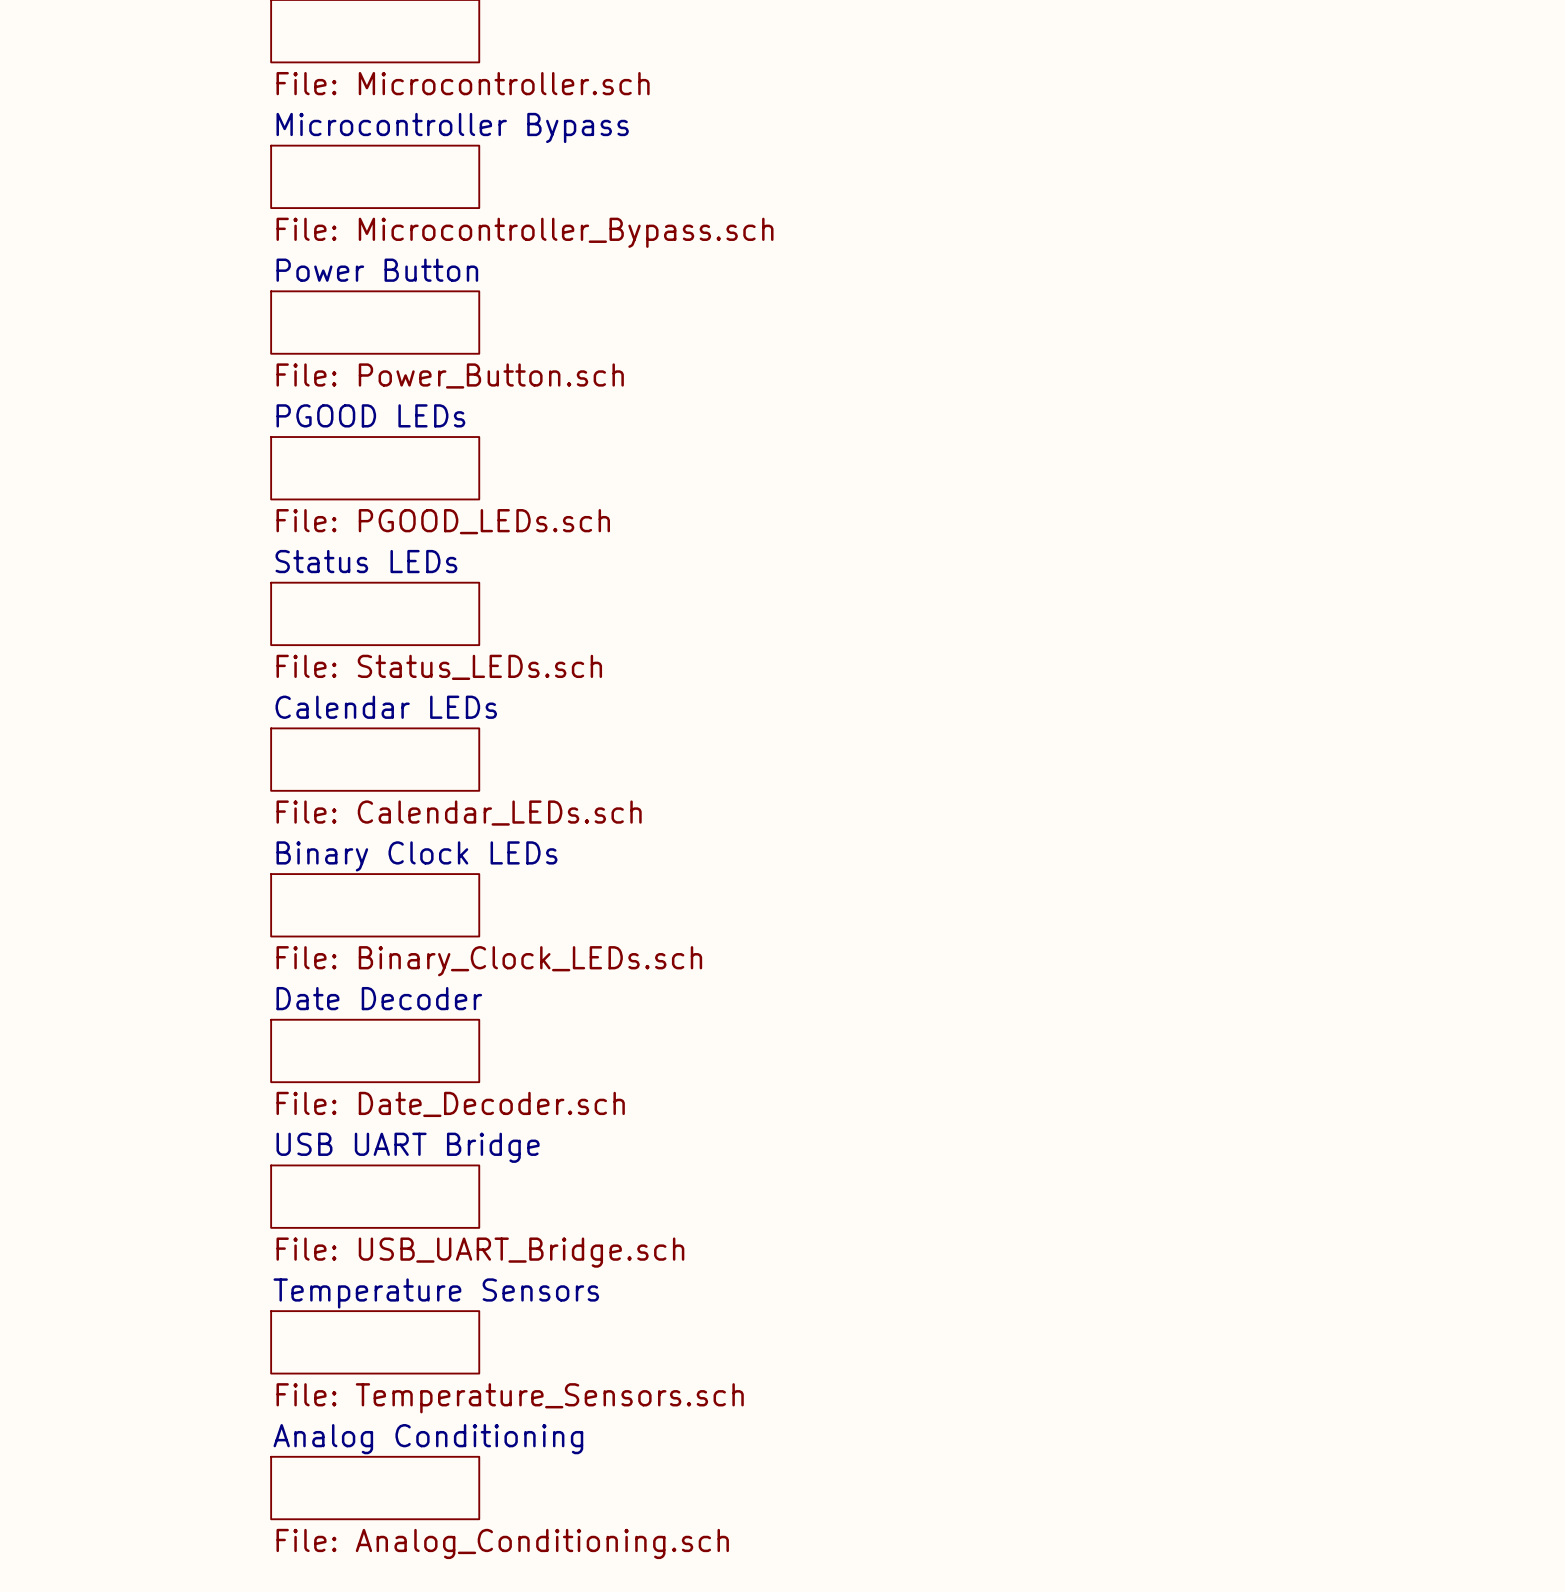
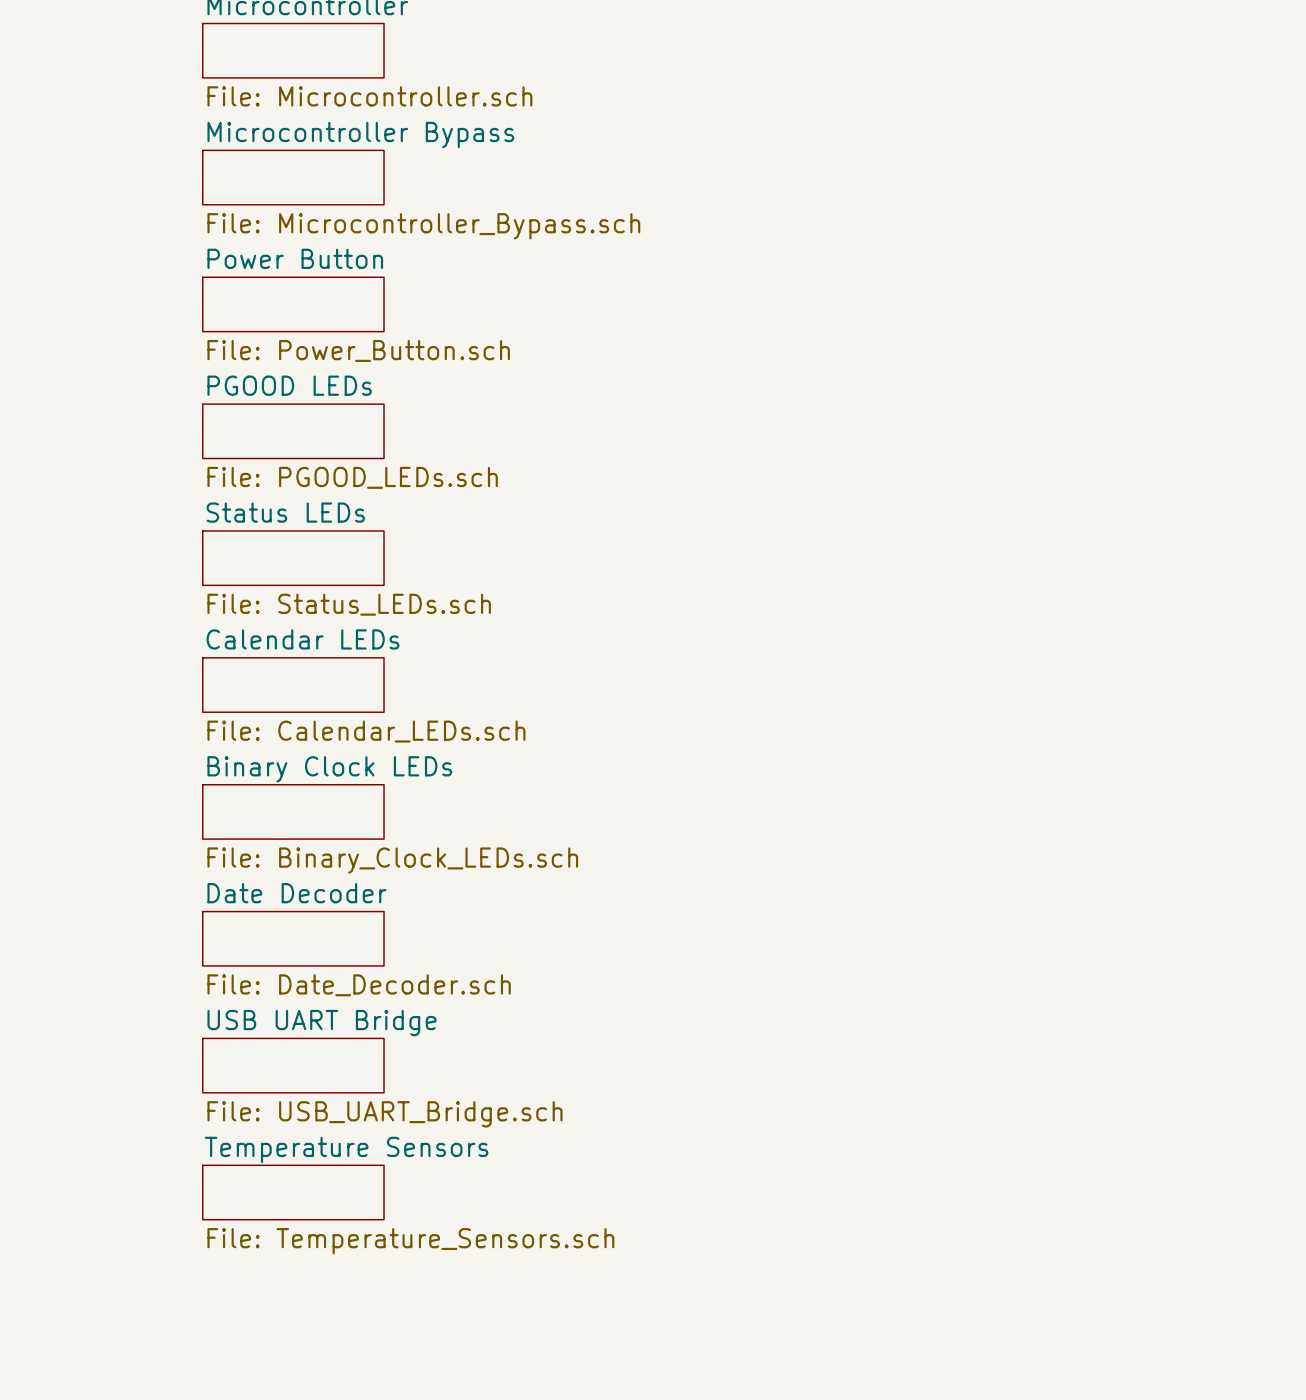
sheet Analog Conditioning: File: Analog_Conditioning.sch (375, 1488) -> none

